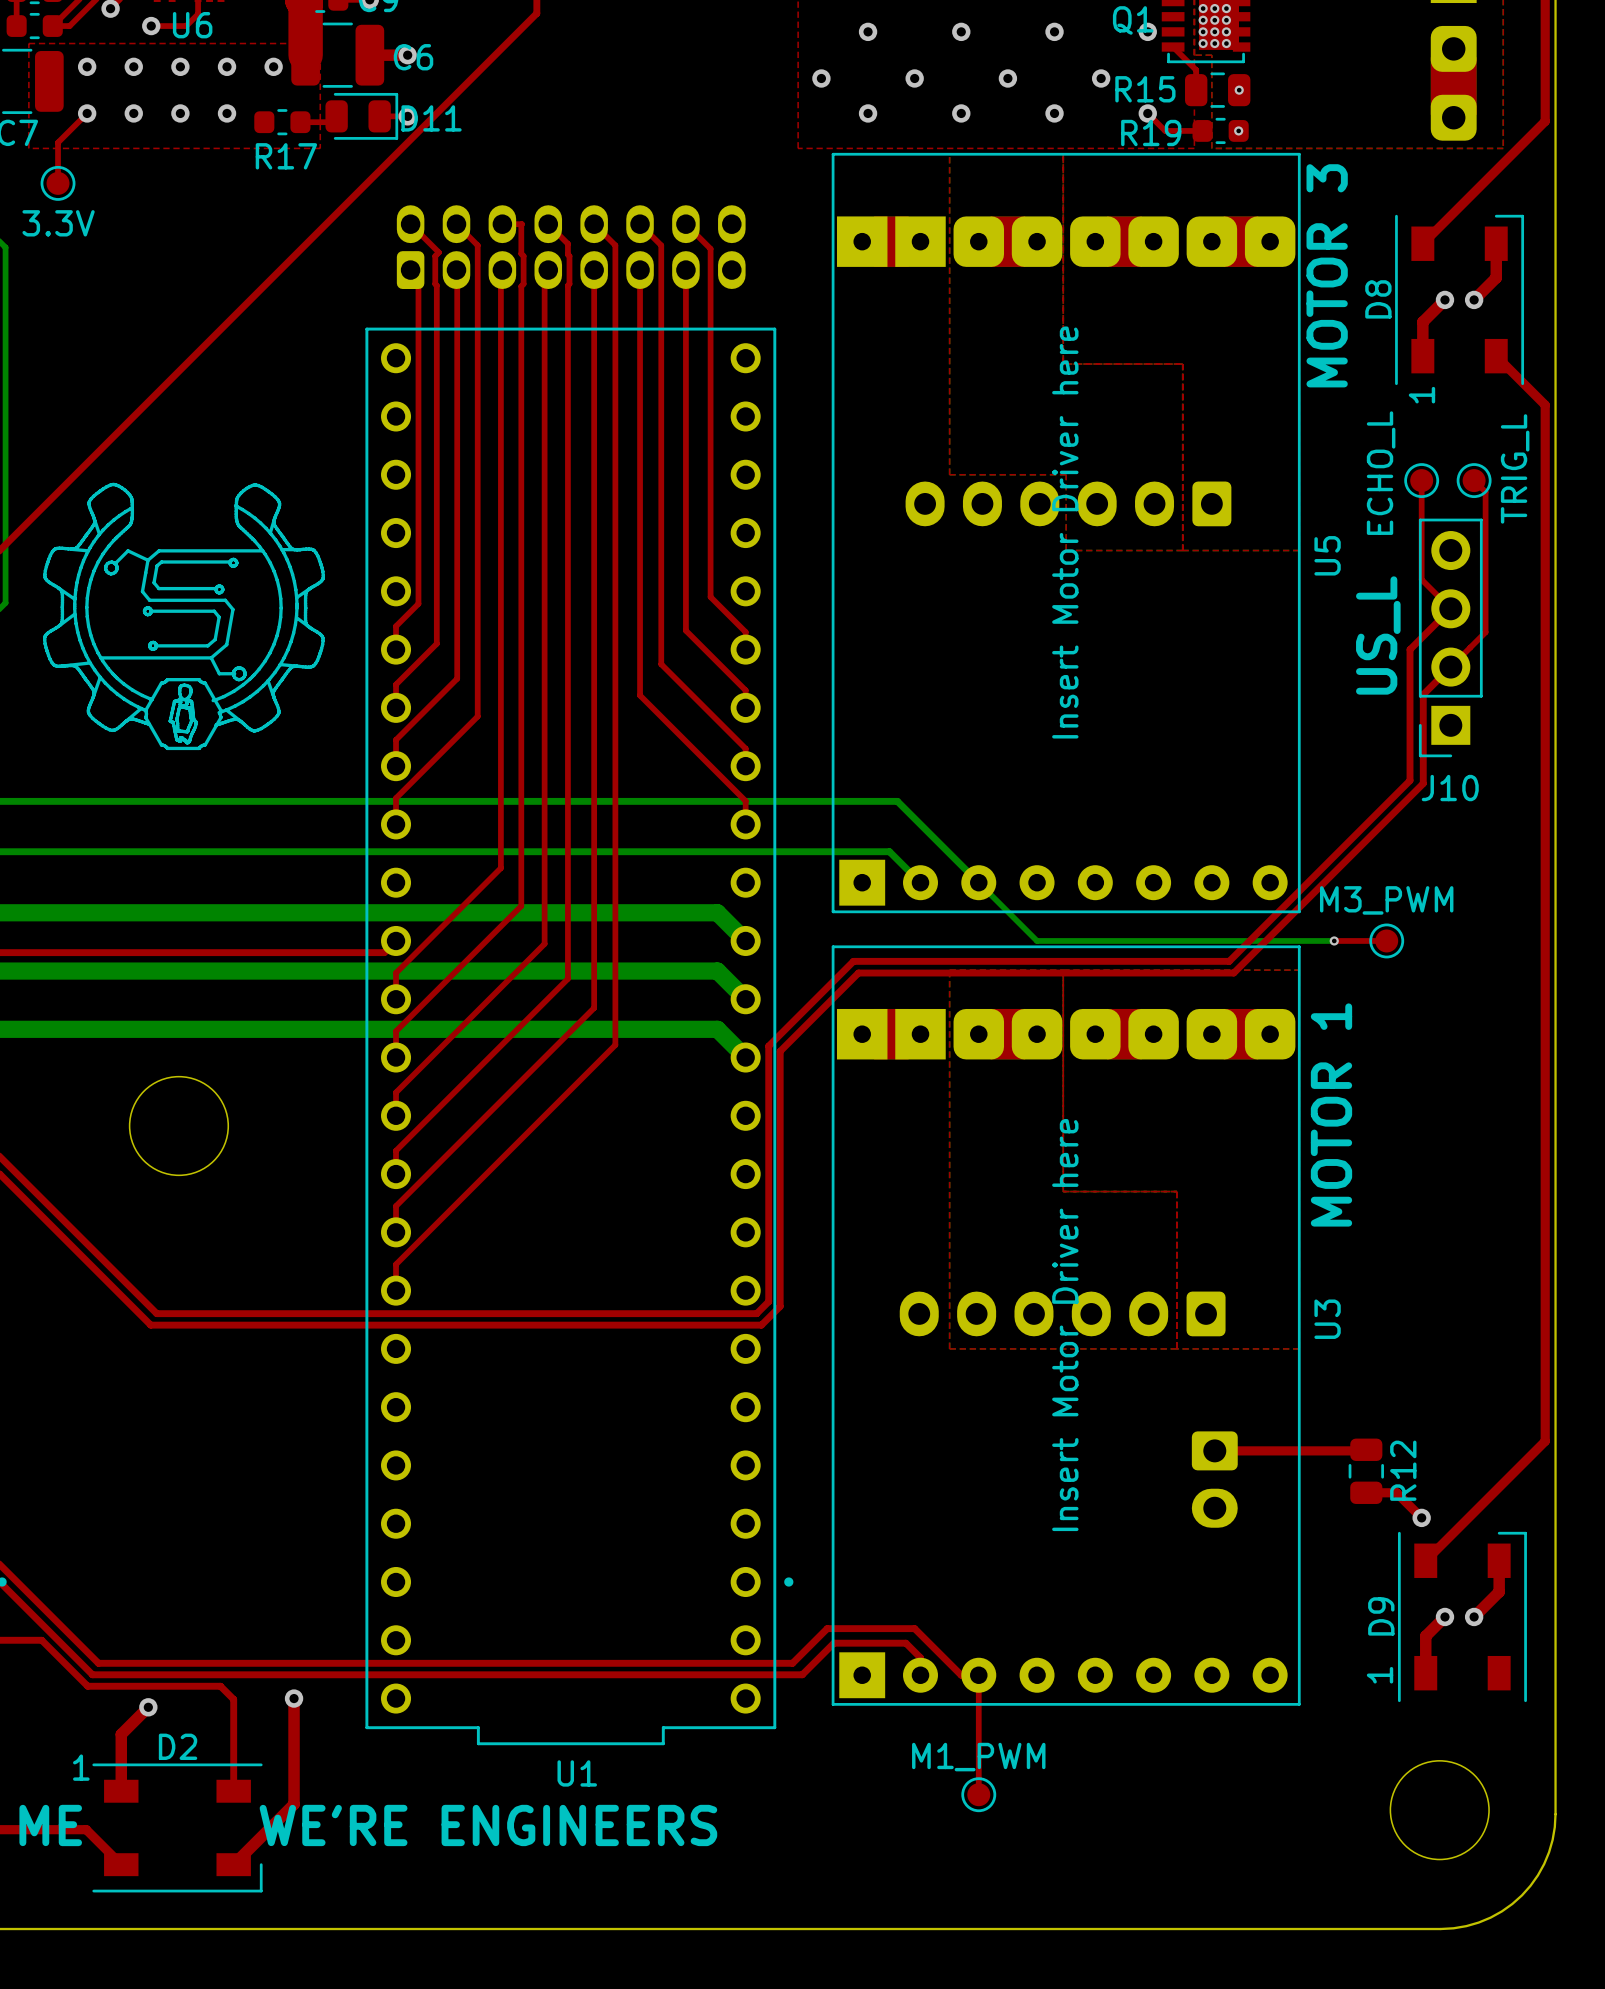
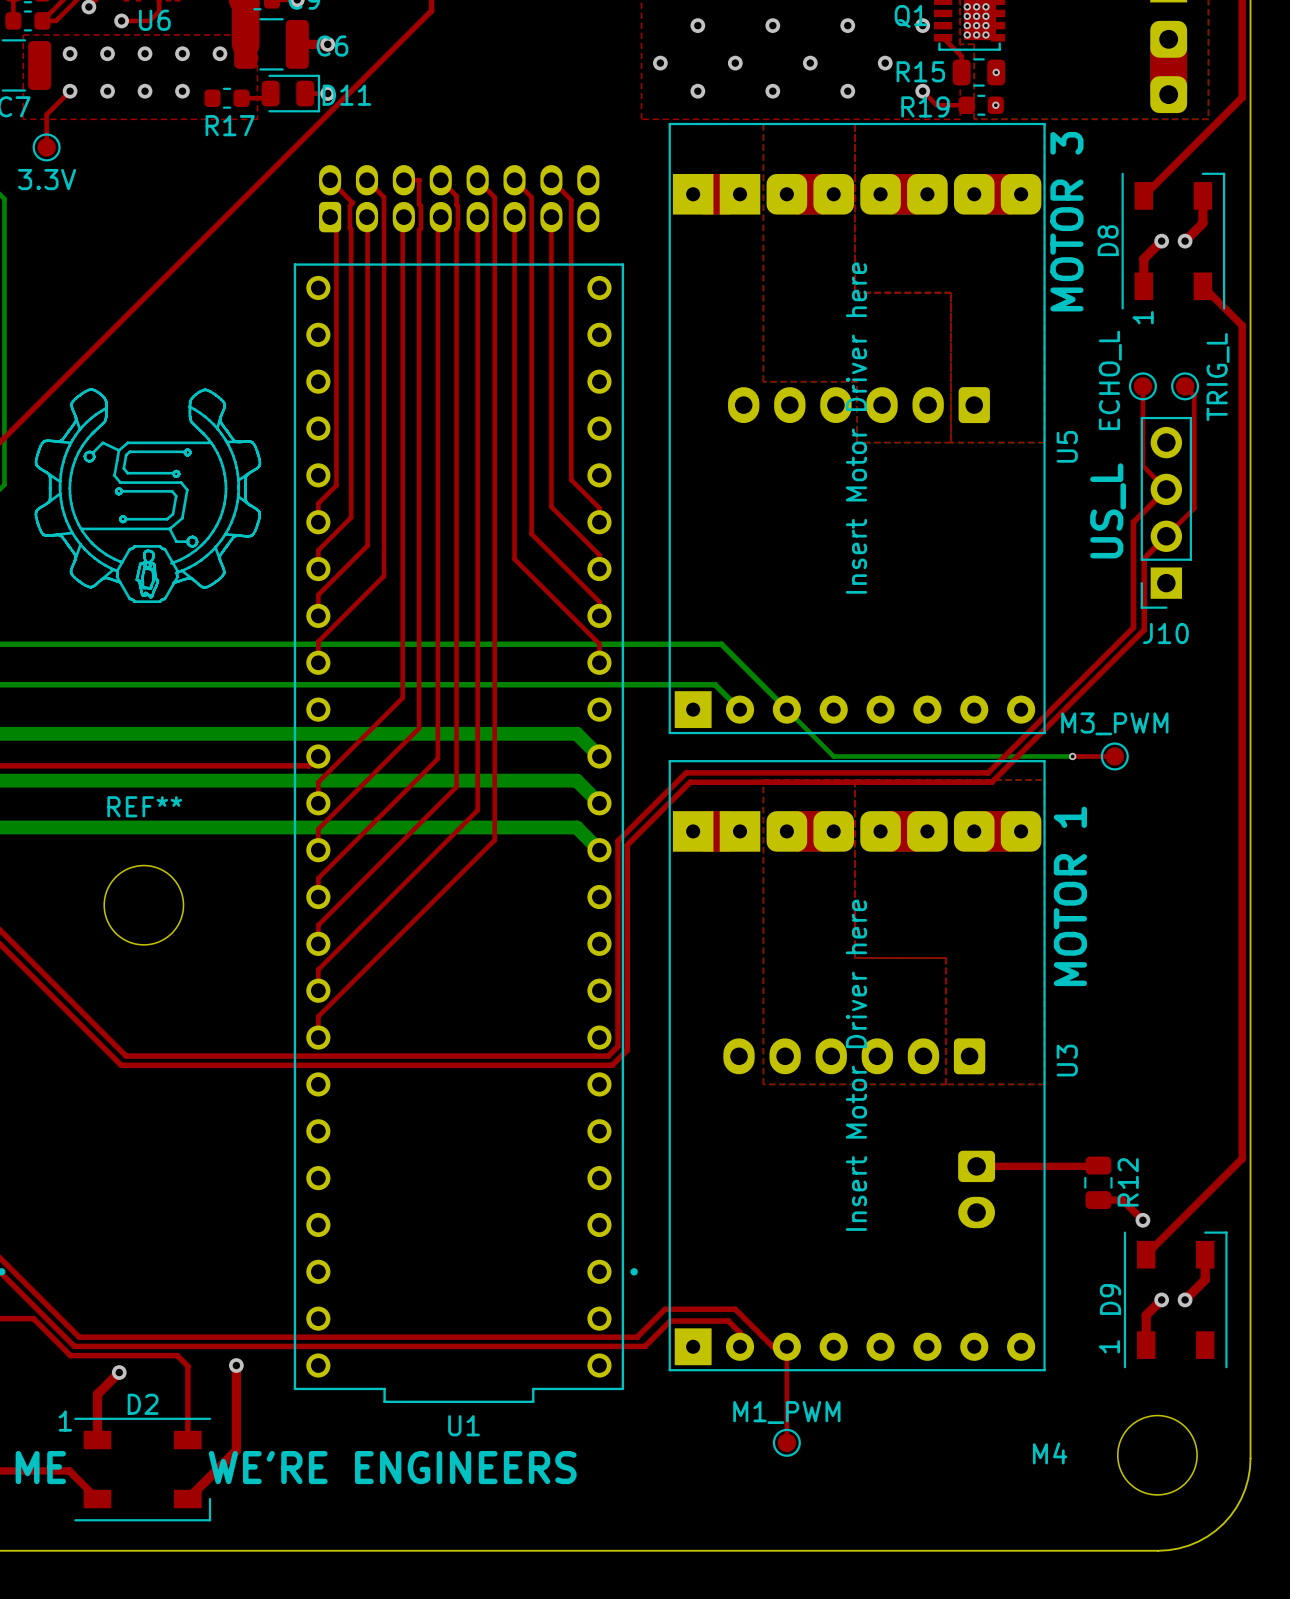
REF** name: none -> REF** (144, 806)
M4 name: none -> M4 (1050, 1453)

